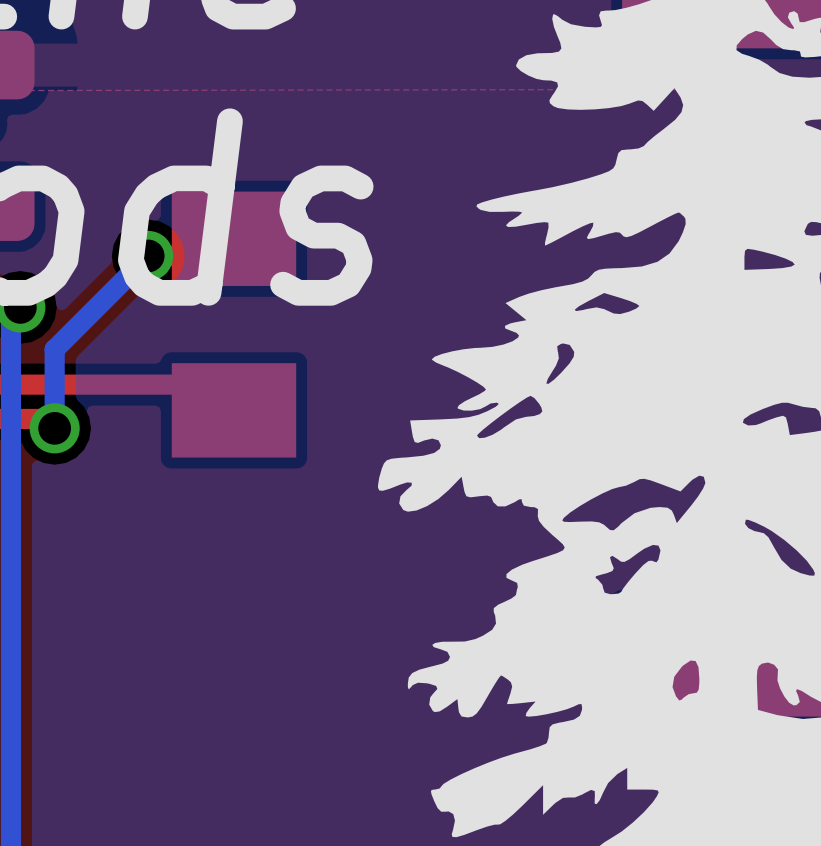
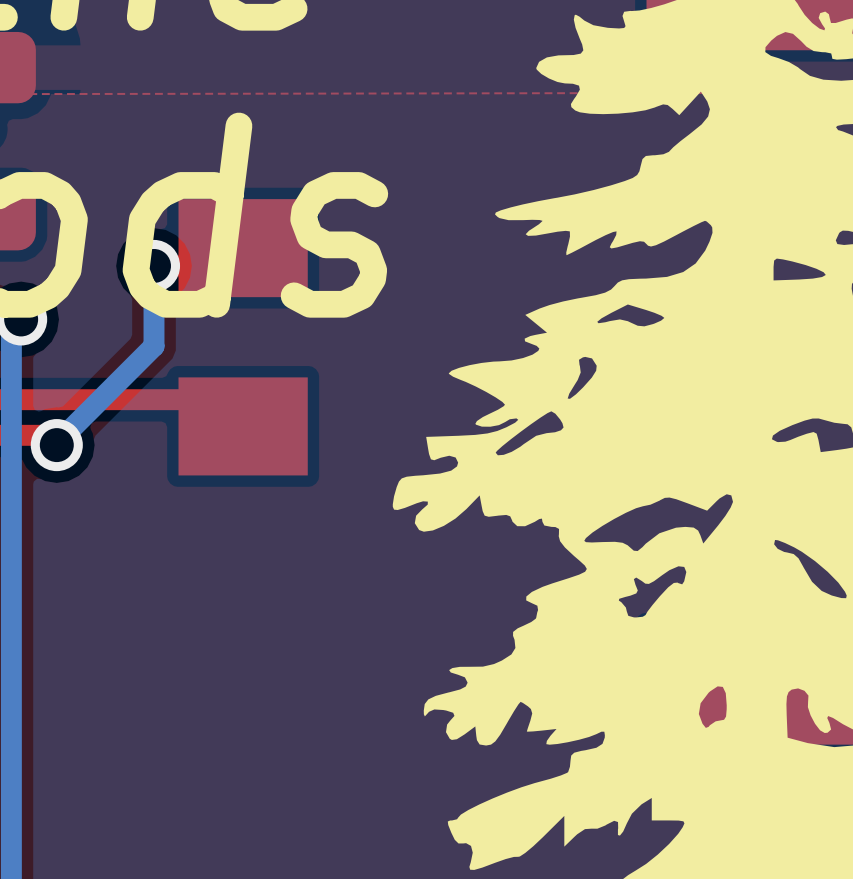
bottom track: (148, 255) (54, 349) (54, 426) -> (154, 265) (154, 346) (56, 443)

